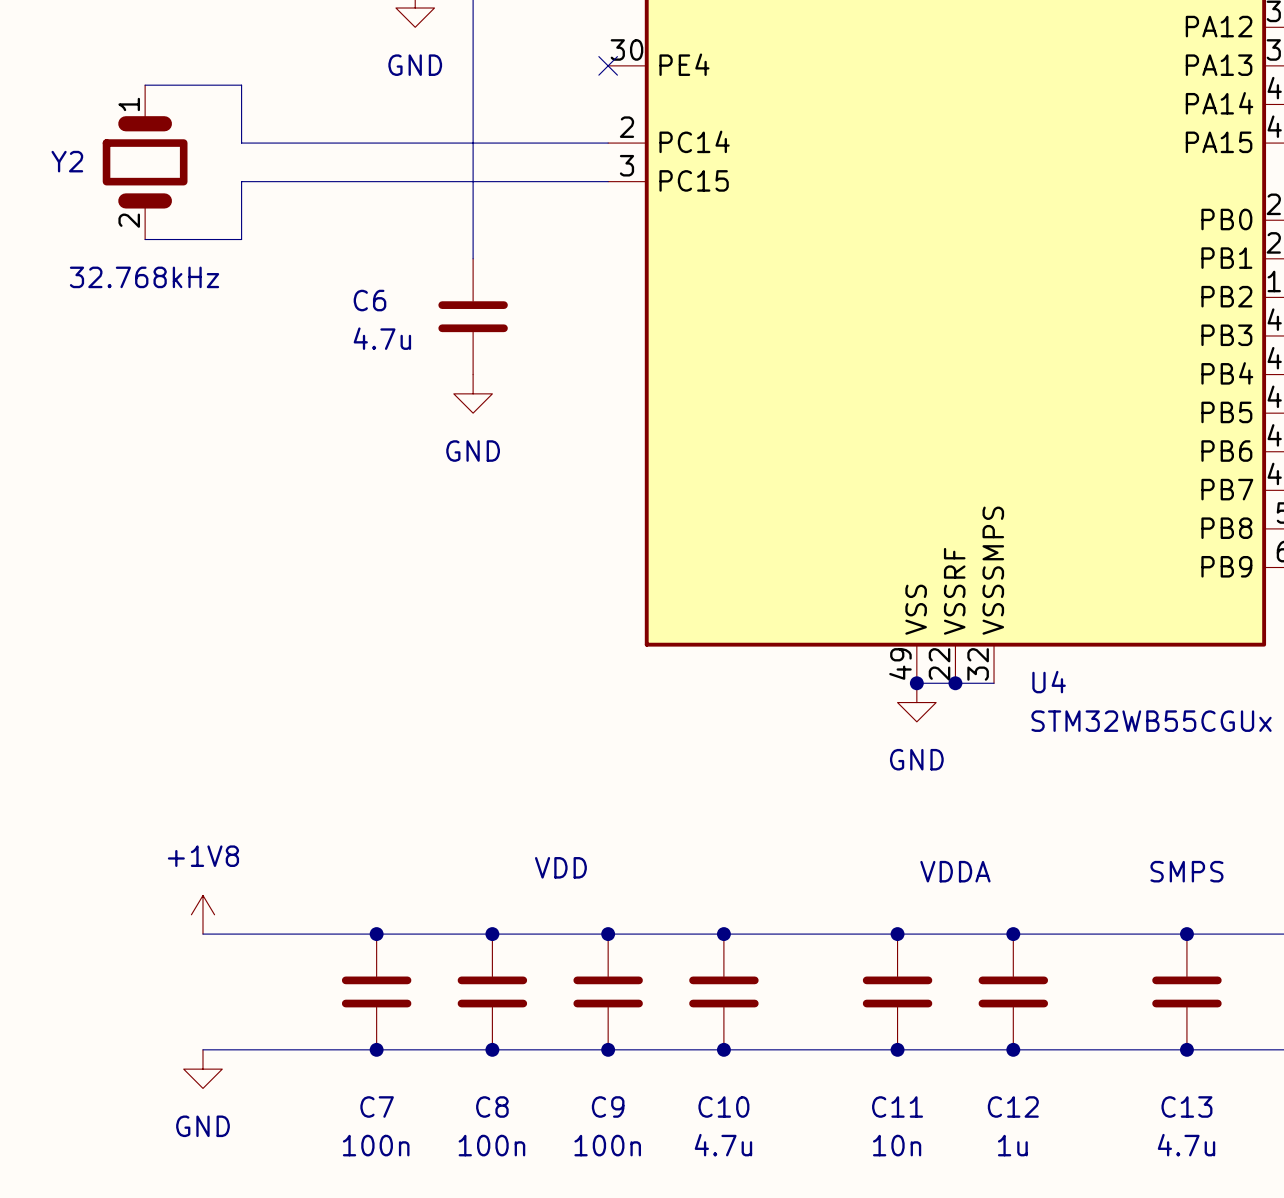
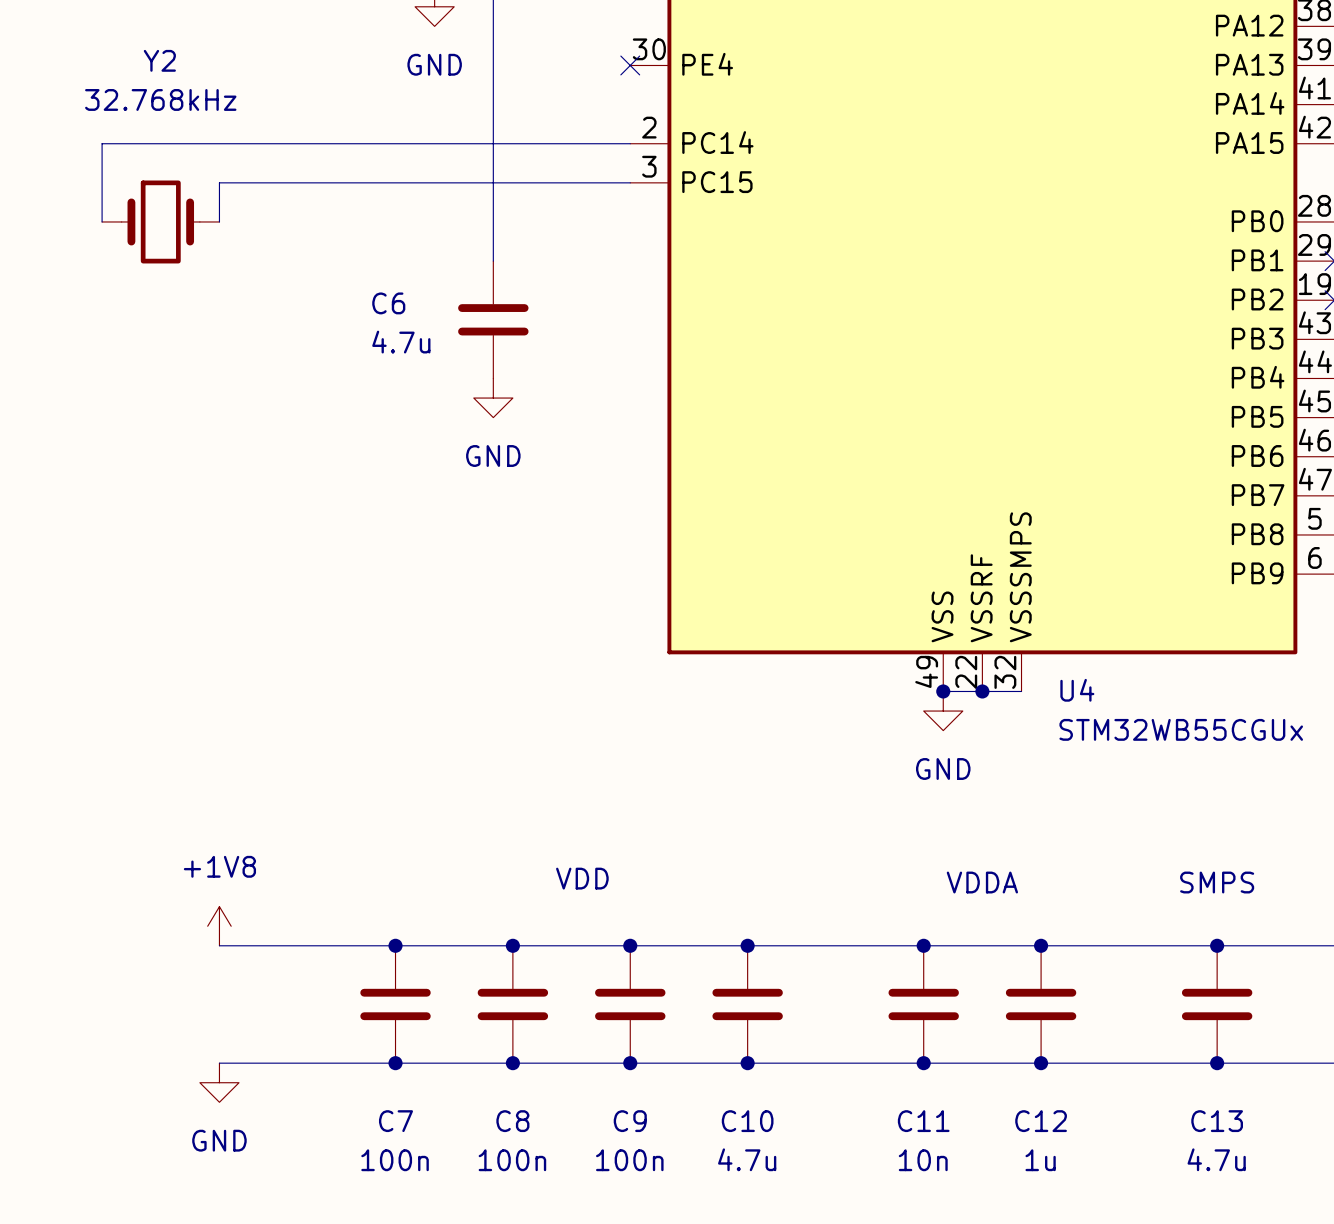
Y2 symbol: [102, 85, 188, 240] -> [102, 180, 220, 264]
wire: (145, 85) (241, 85) (241, 143) -> (102, 221) (102, 143) (258, 143)
Y2 name position: Y2 (67, 161) -> Y2 (159, 60)
wire: (241, 181) (241, 239) (145, 239) -> (258, 182) (219, 182) (219, 221)
Y2 value position: 32.768kHz (144, 277) -> 32.768kHz (160, 99)

